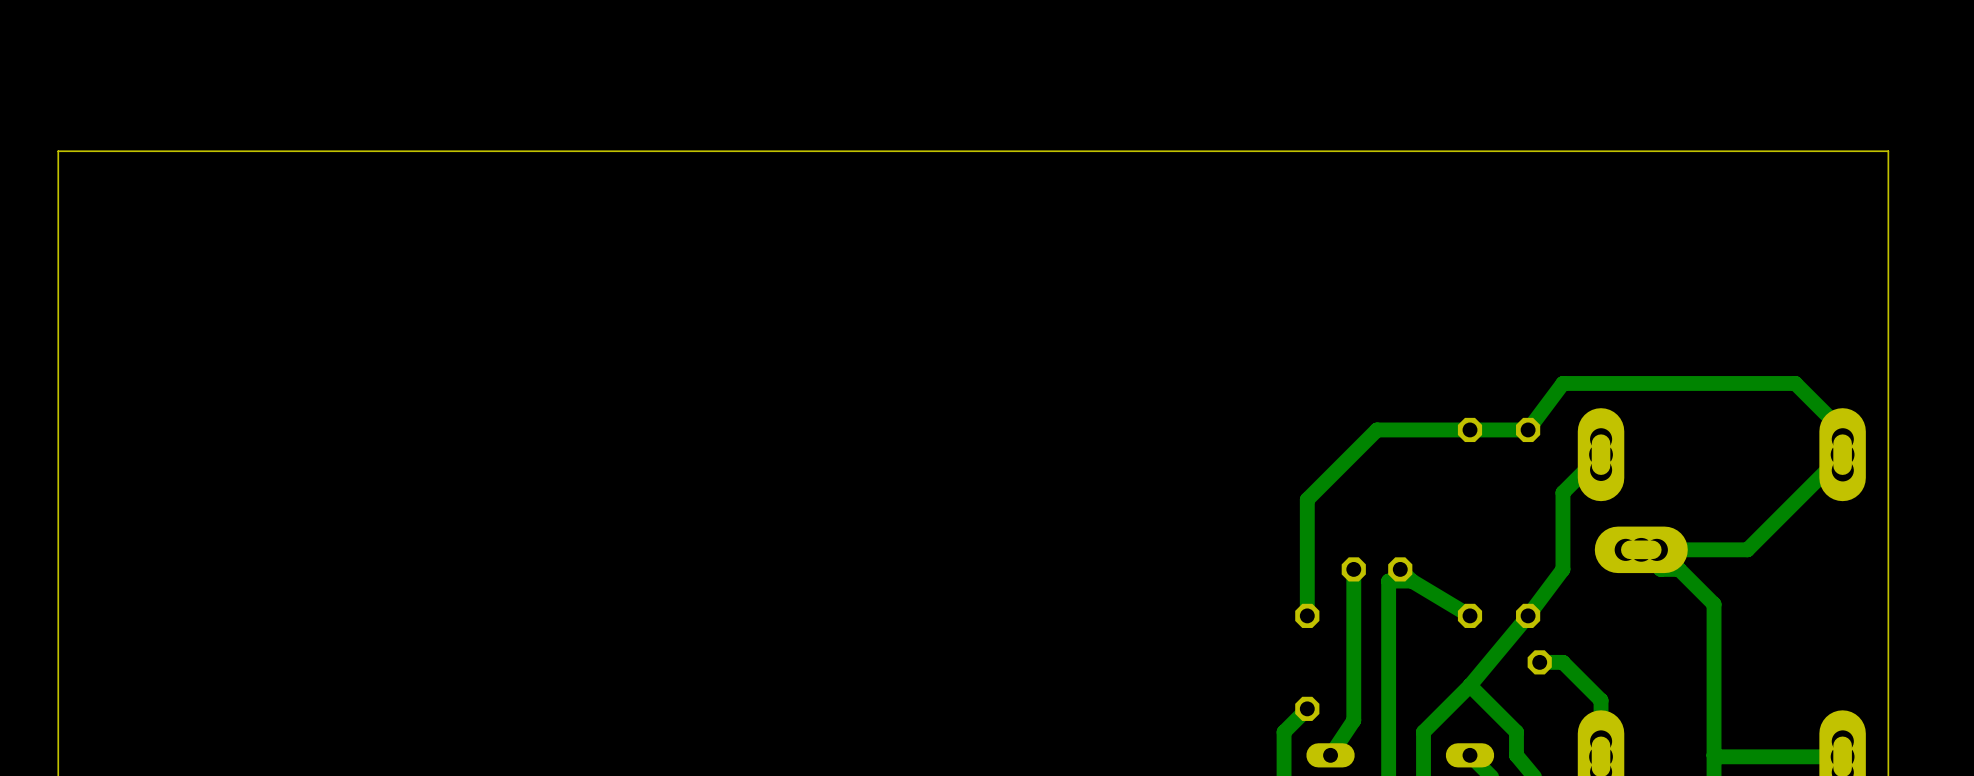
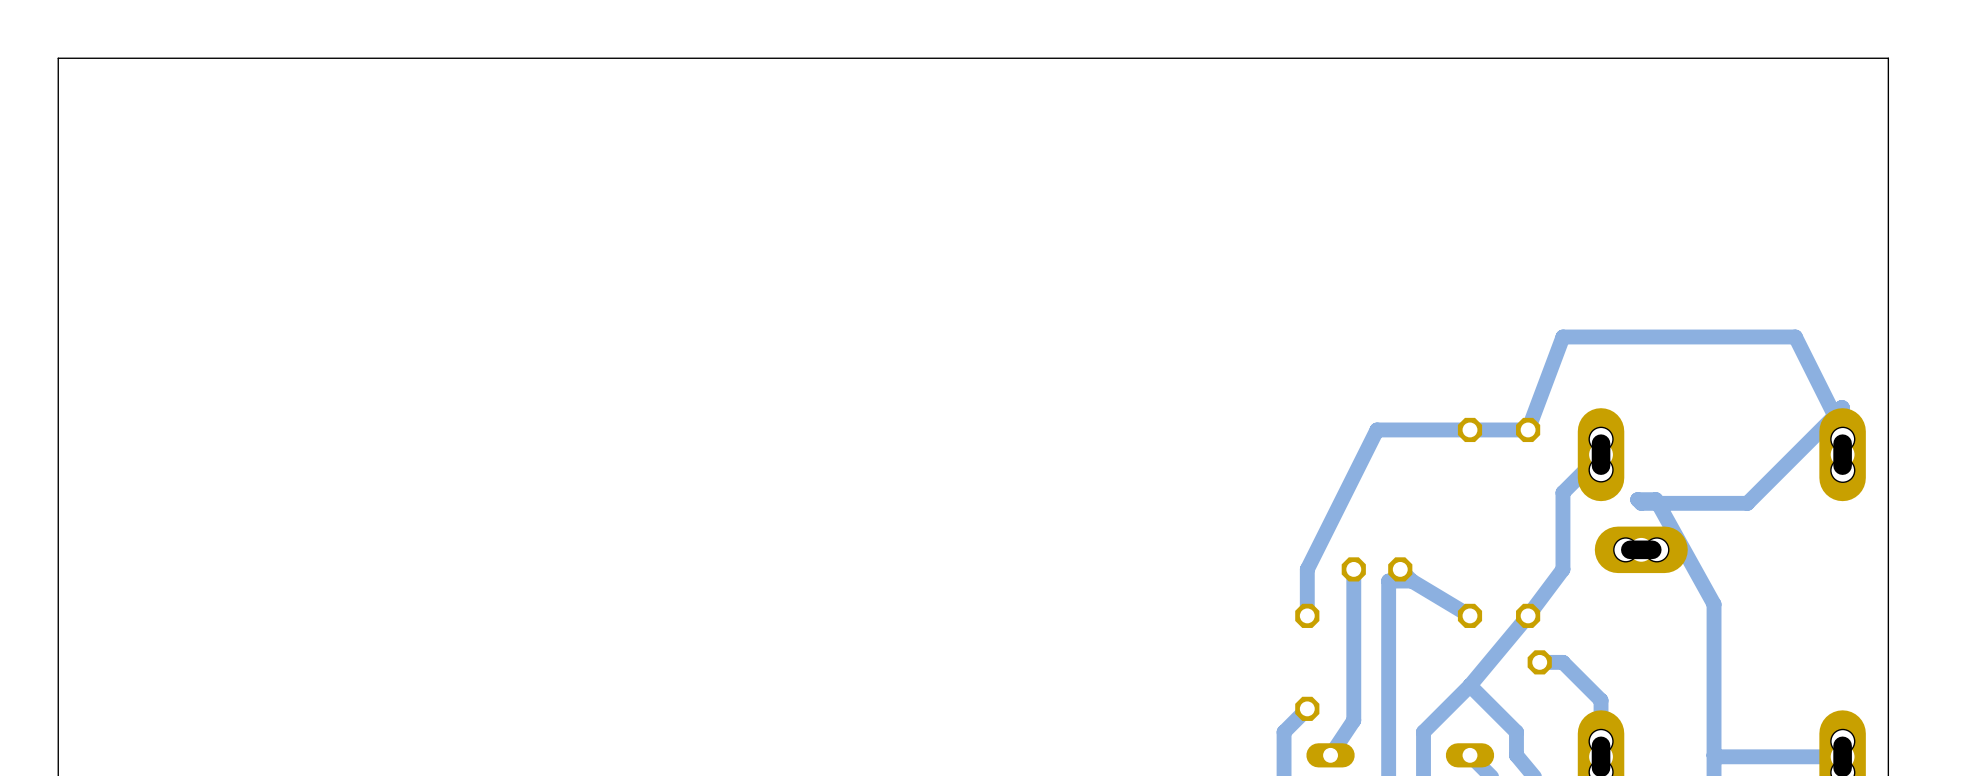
board edge: (1888, 151) (58, 151) -> (1888, 151) (1888, 58) (58, 58) (58, 151)
bottom track: (1377, 429) (1307, 499) (1307, 569) -> (1377, 429) (1307, 569)
bottom track: (1528, 429) (1562, 383) (1795, 383) (1841, 429) (1842, 454) (1747, 549) (1641, 549) (1660, 569) (1679, 569) (1714, 604) -> (1528, 429) (1562, 336) (1795, 336) (1841, 429) (1841, 407) (1842, 408) (1747, 503) (1641, 503) (1637, 499) (1655, 499) (1714, 604)

